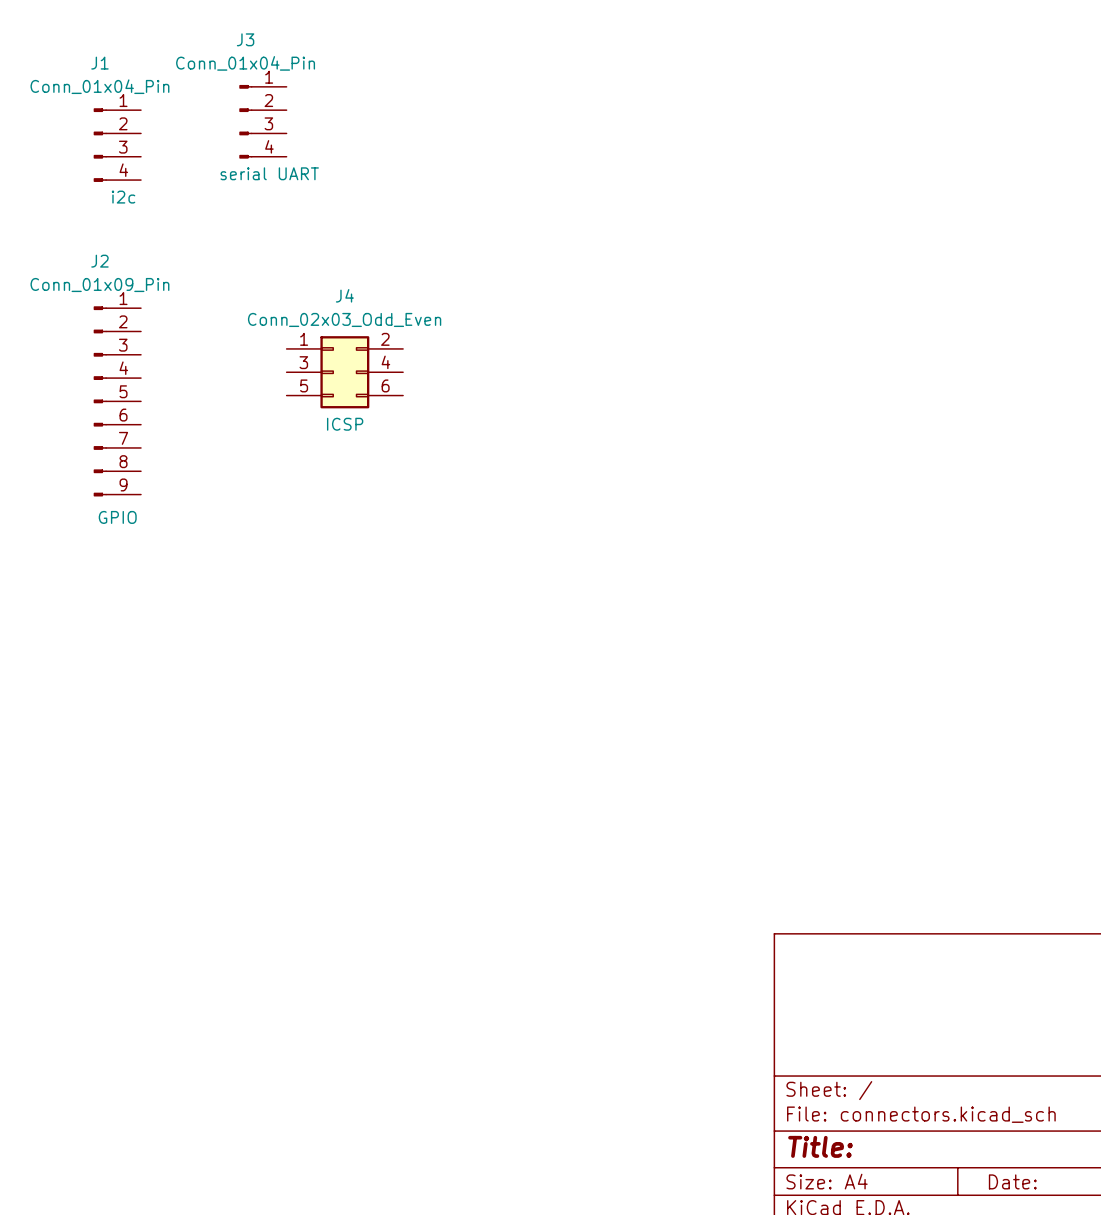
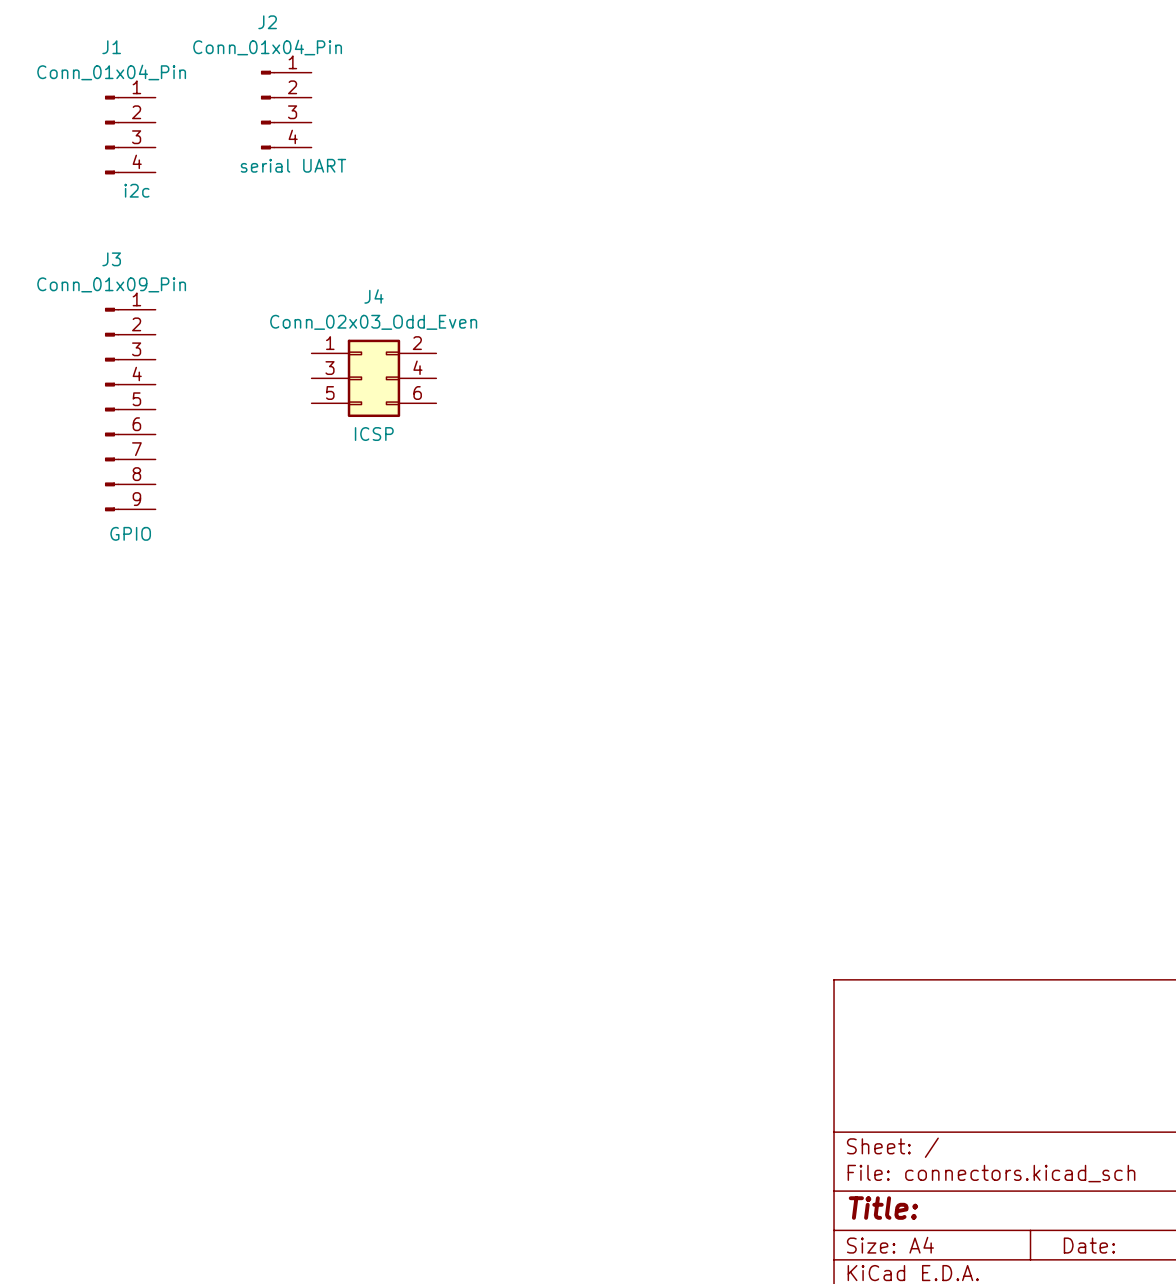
J3 name: J3 (245, 39) -> J2 (267, 22)
J2 name: J2 (99, 261) -> J3 (111, 259)

